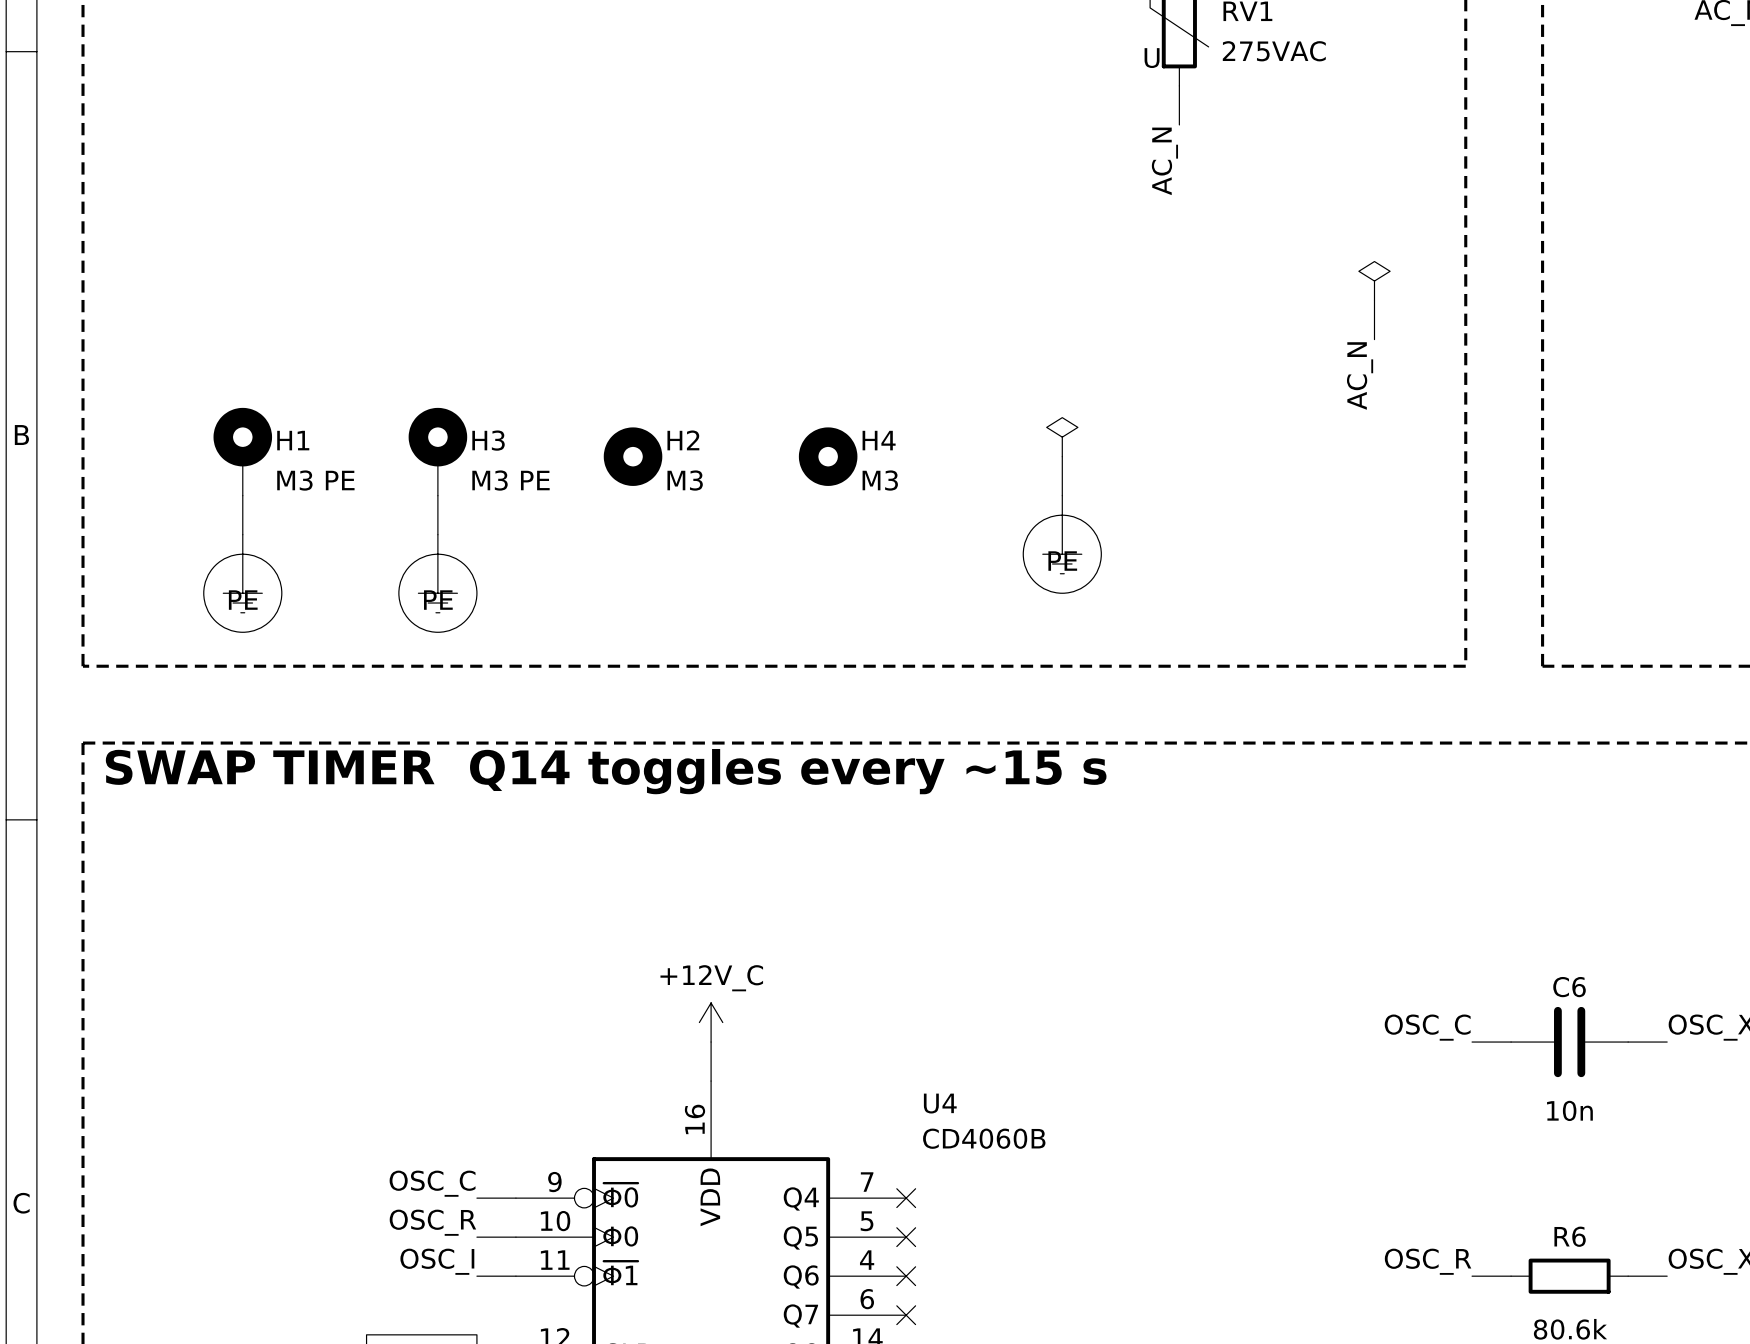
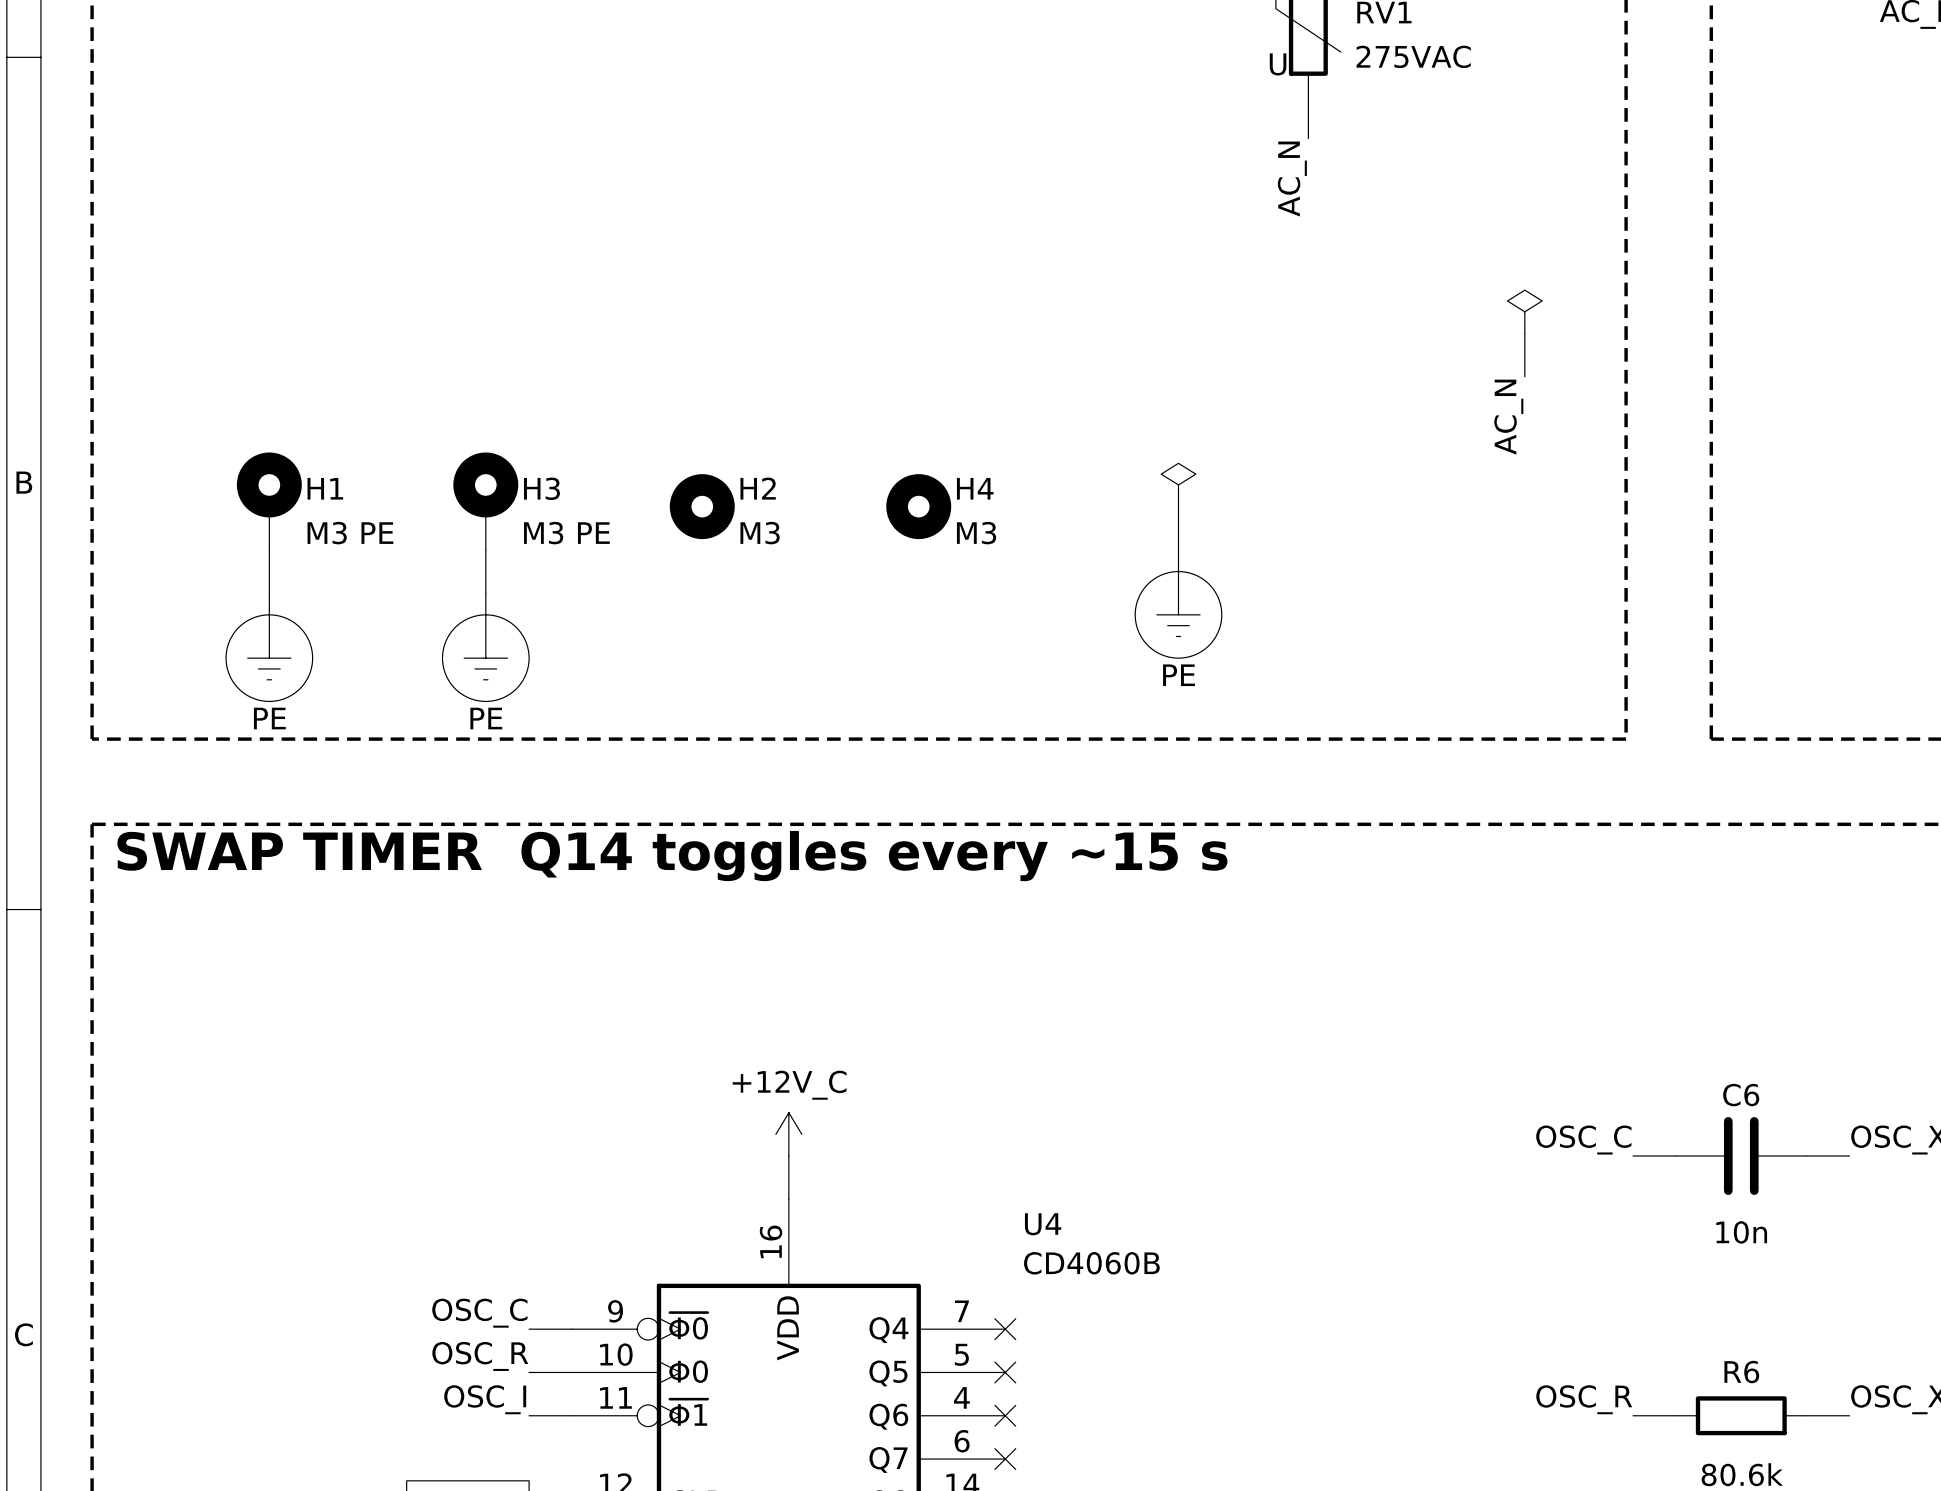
power symbol text position: PE (1062, 561) -> PE (1179, 675)
power symbol text position: PE (243, 600) -> PE (269, 718)
power symbol text position: PE (438, 600) -> PE (486, 718)

